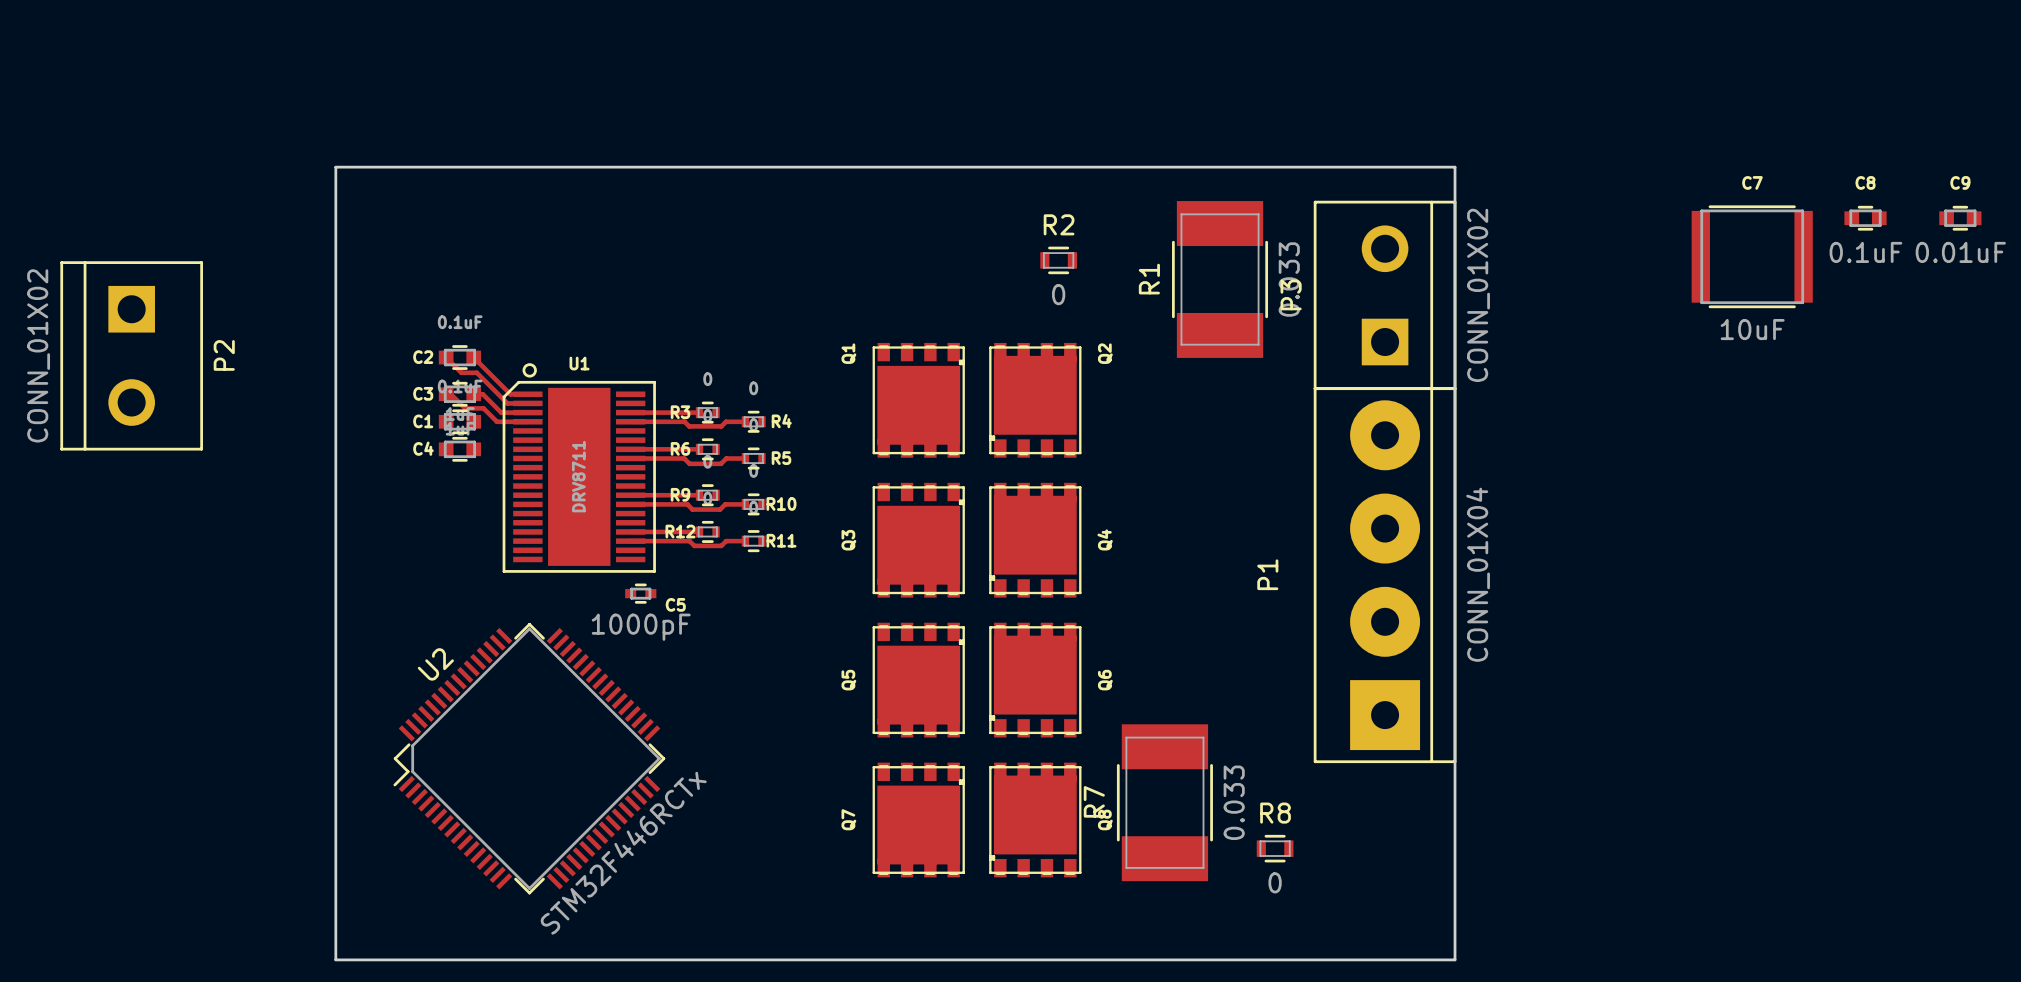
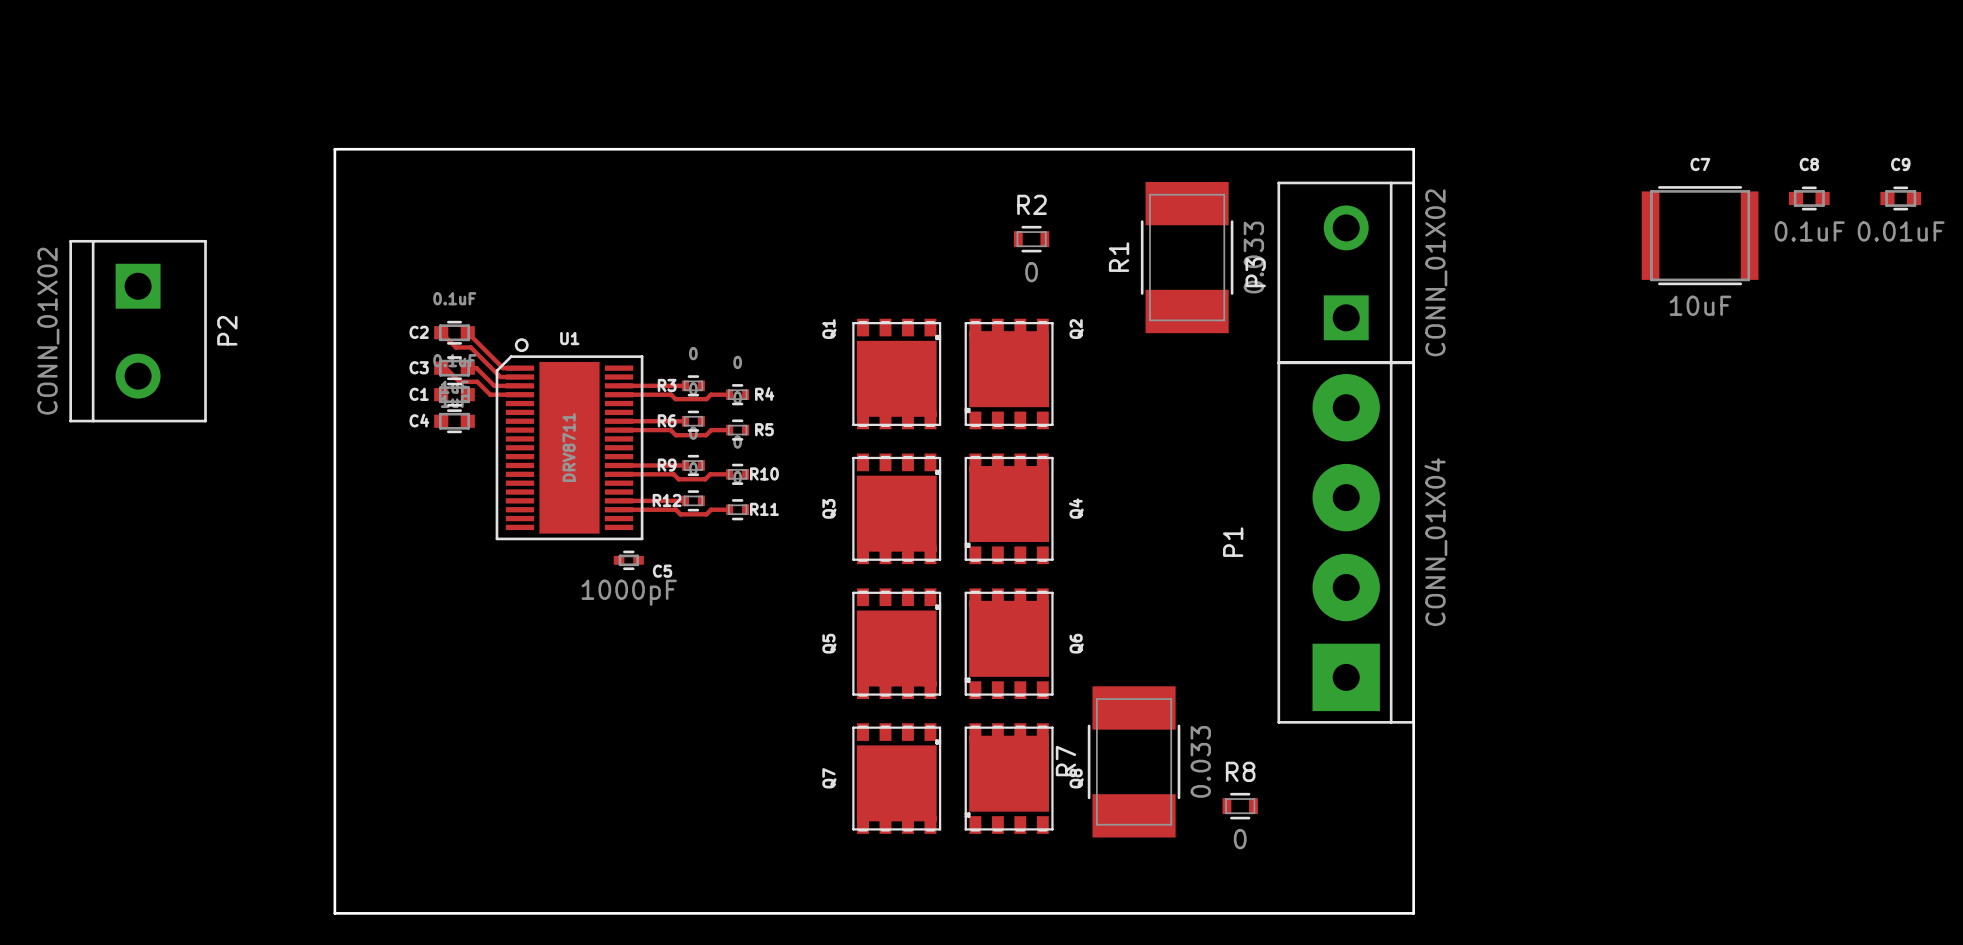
U2: STM32F446RCTx (529, 758) -> none

